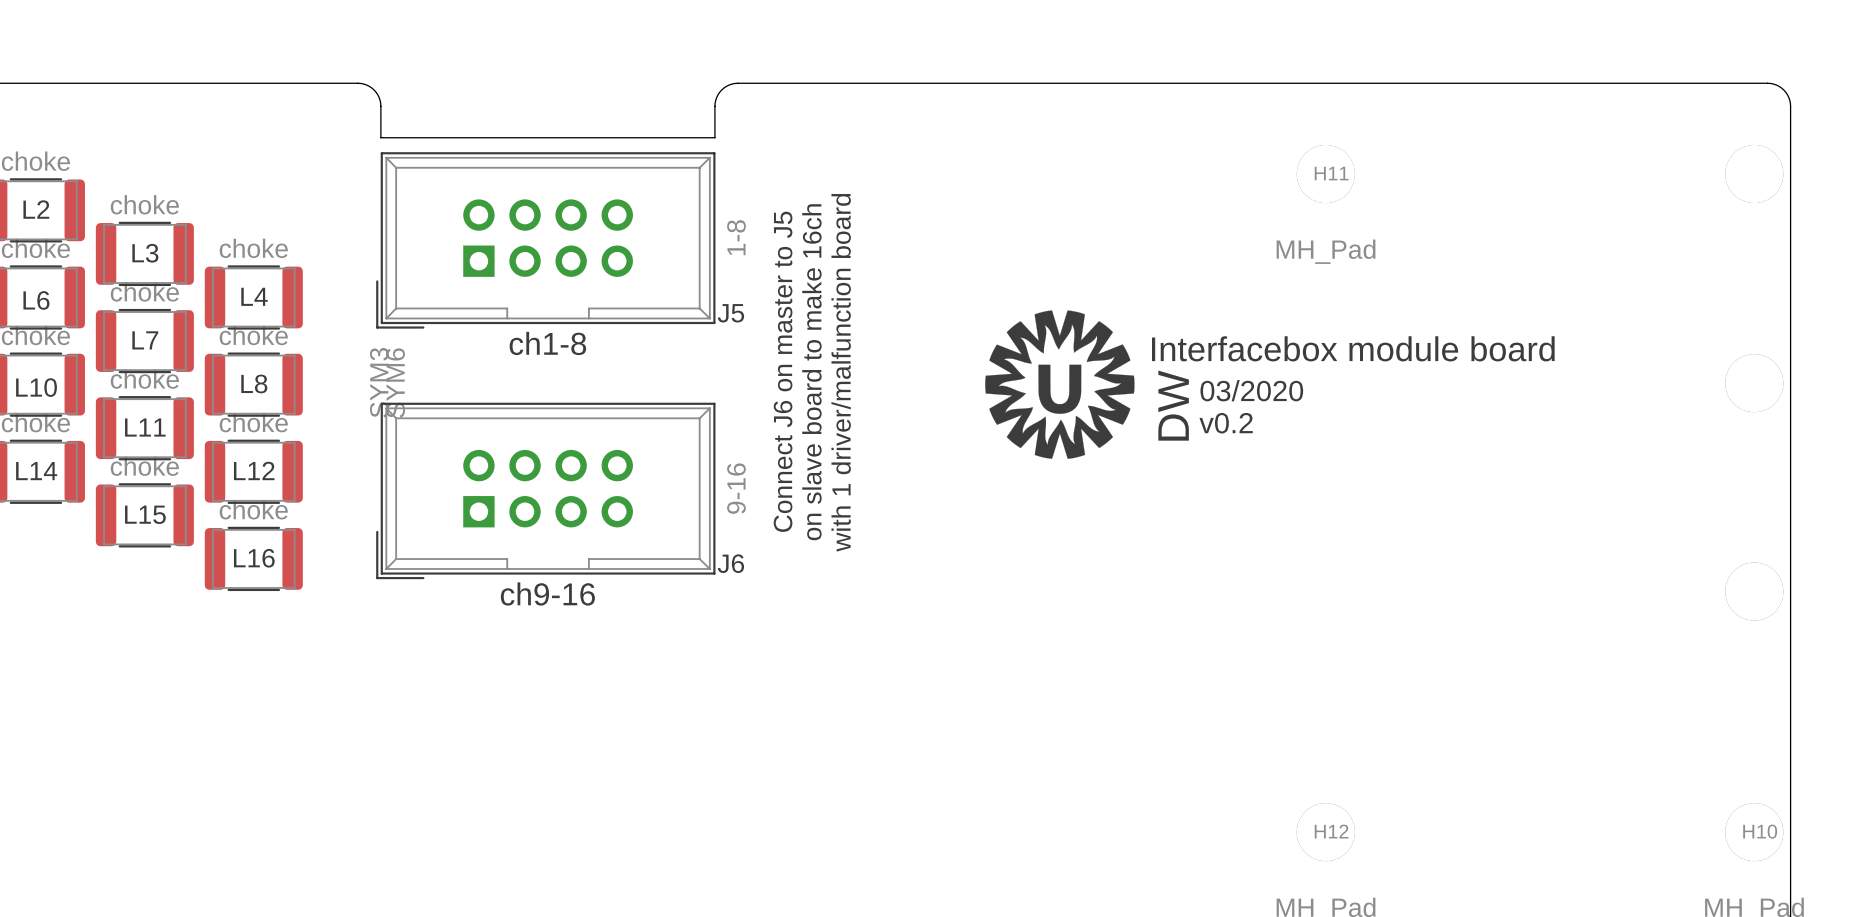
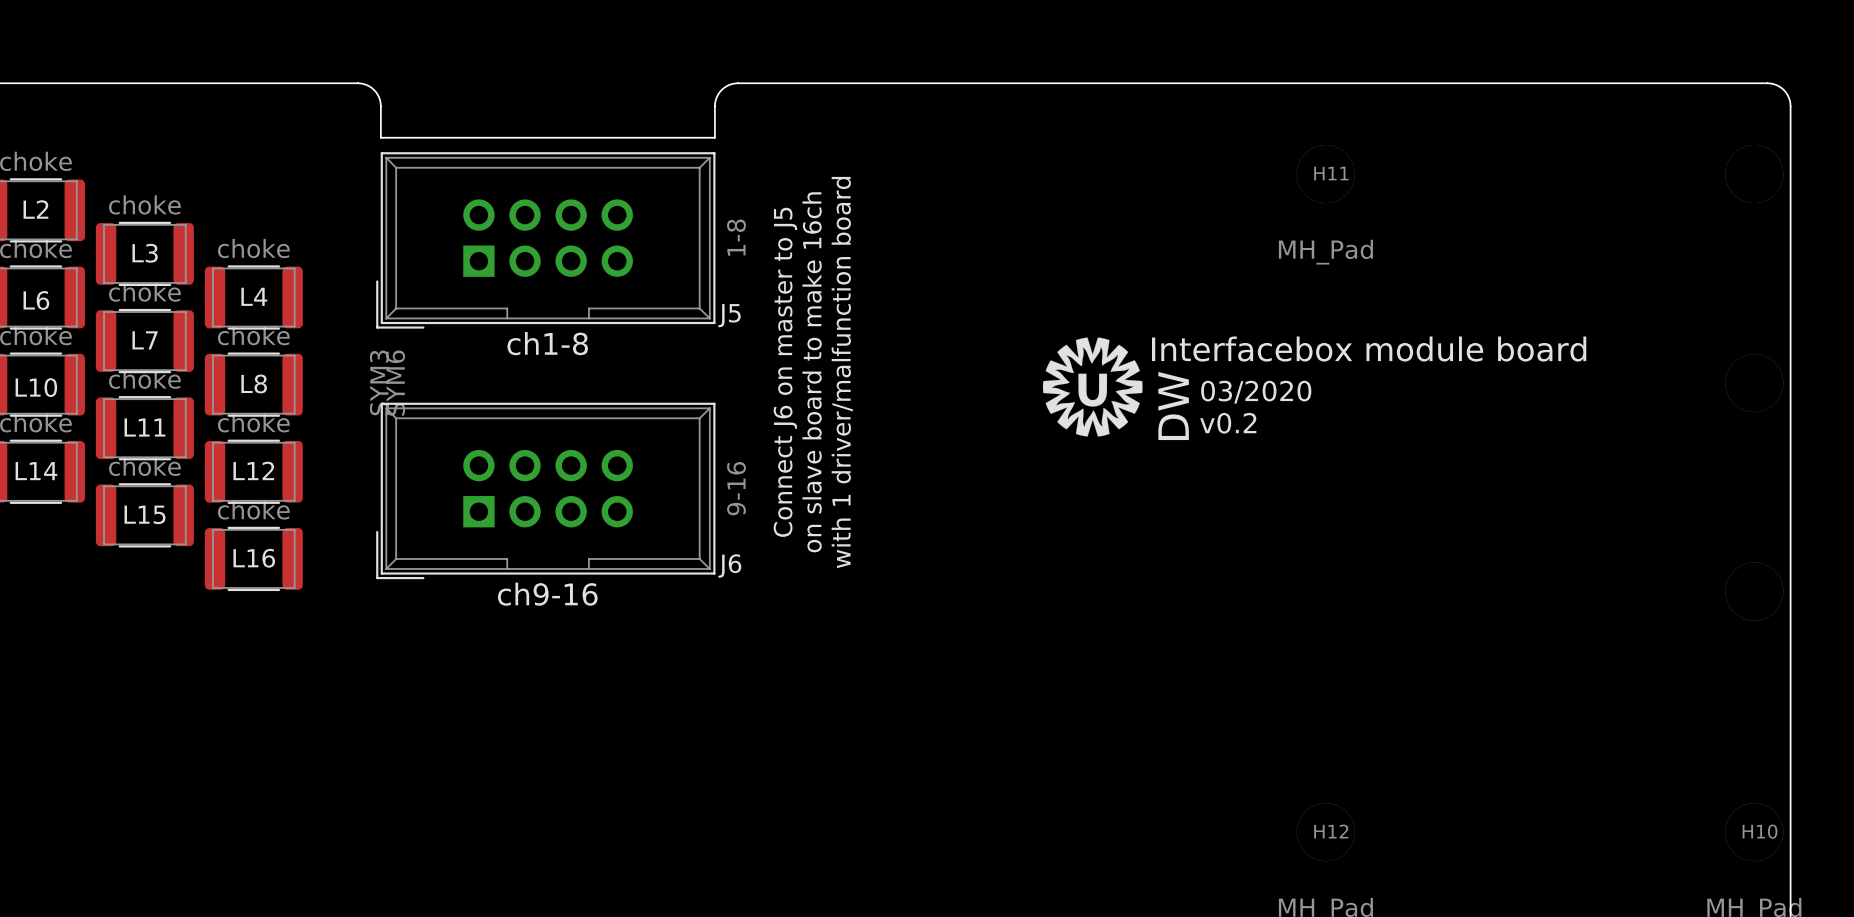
drawing: [985, 310, 1135, 459] -> none
drawing: none -> [1042, 337, 1143, 437]

